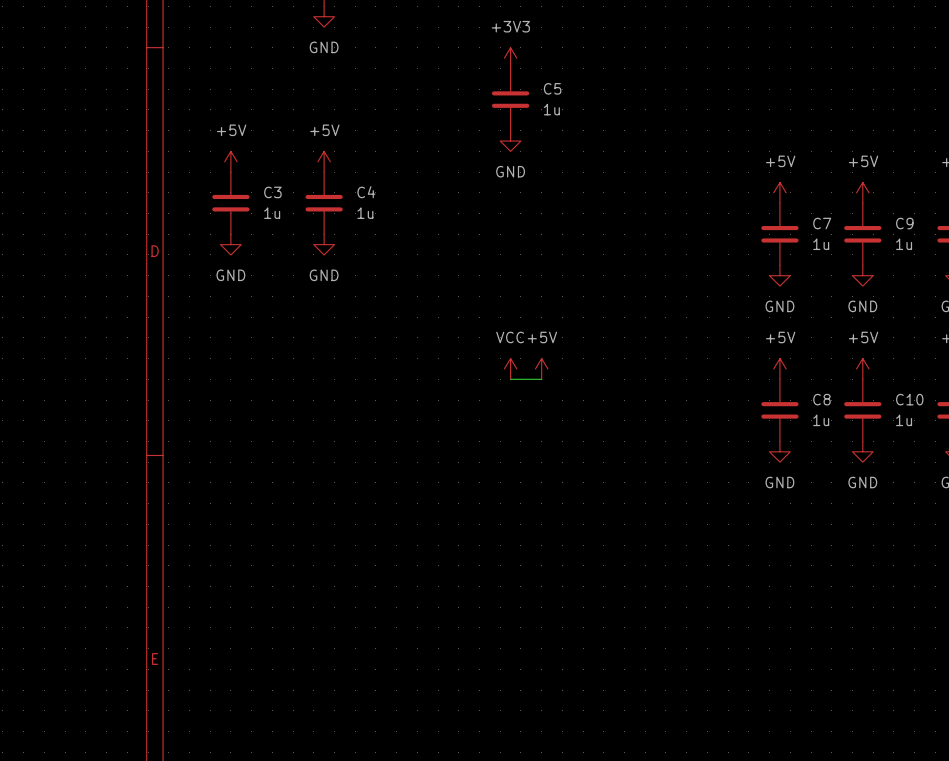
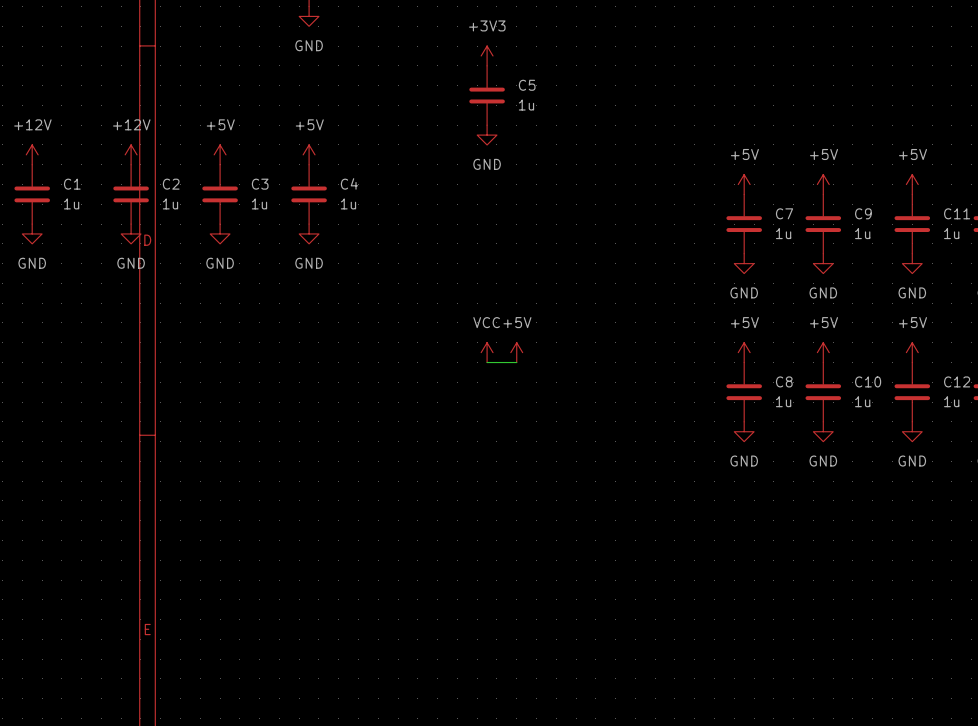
power symbol: none -> +12V (32, 154)
power symbol: none -> +12V (131, 154)
C1: none -> 1u (32, 194)
C2: none -> 1u (131, 194)
power symbol: none -> GND (32, 233)
power symbol: none -> GND (131, 233)

